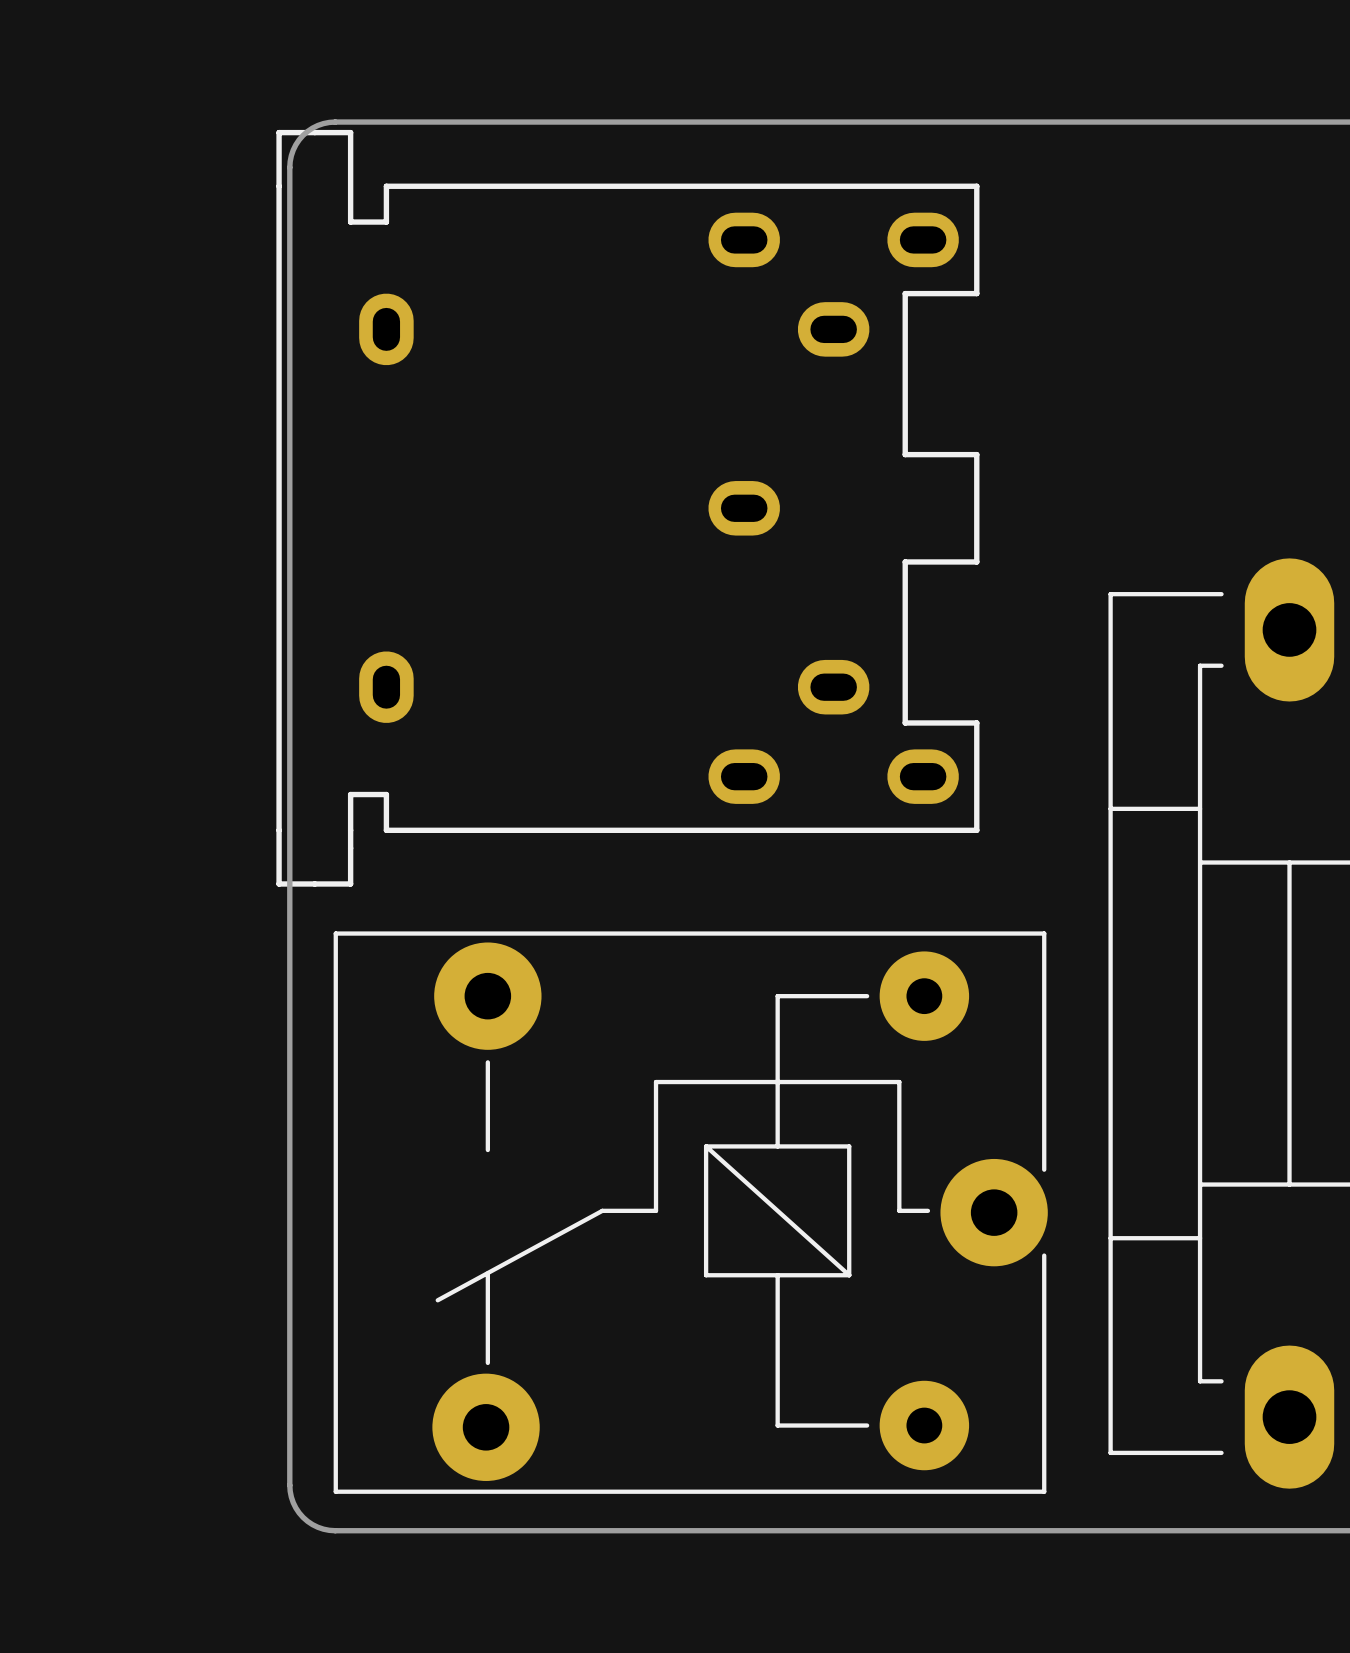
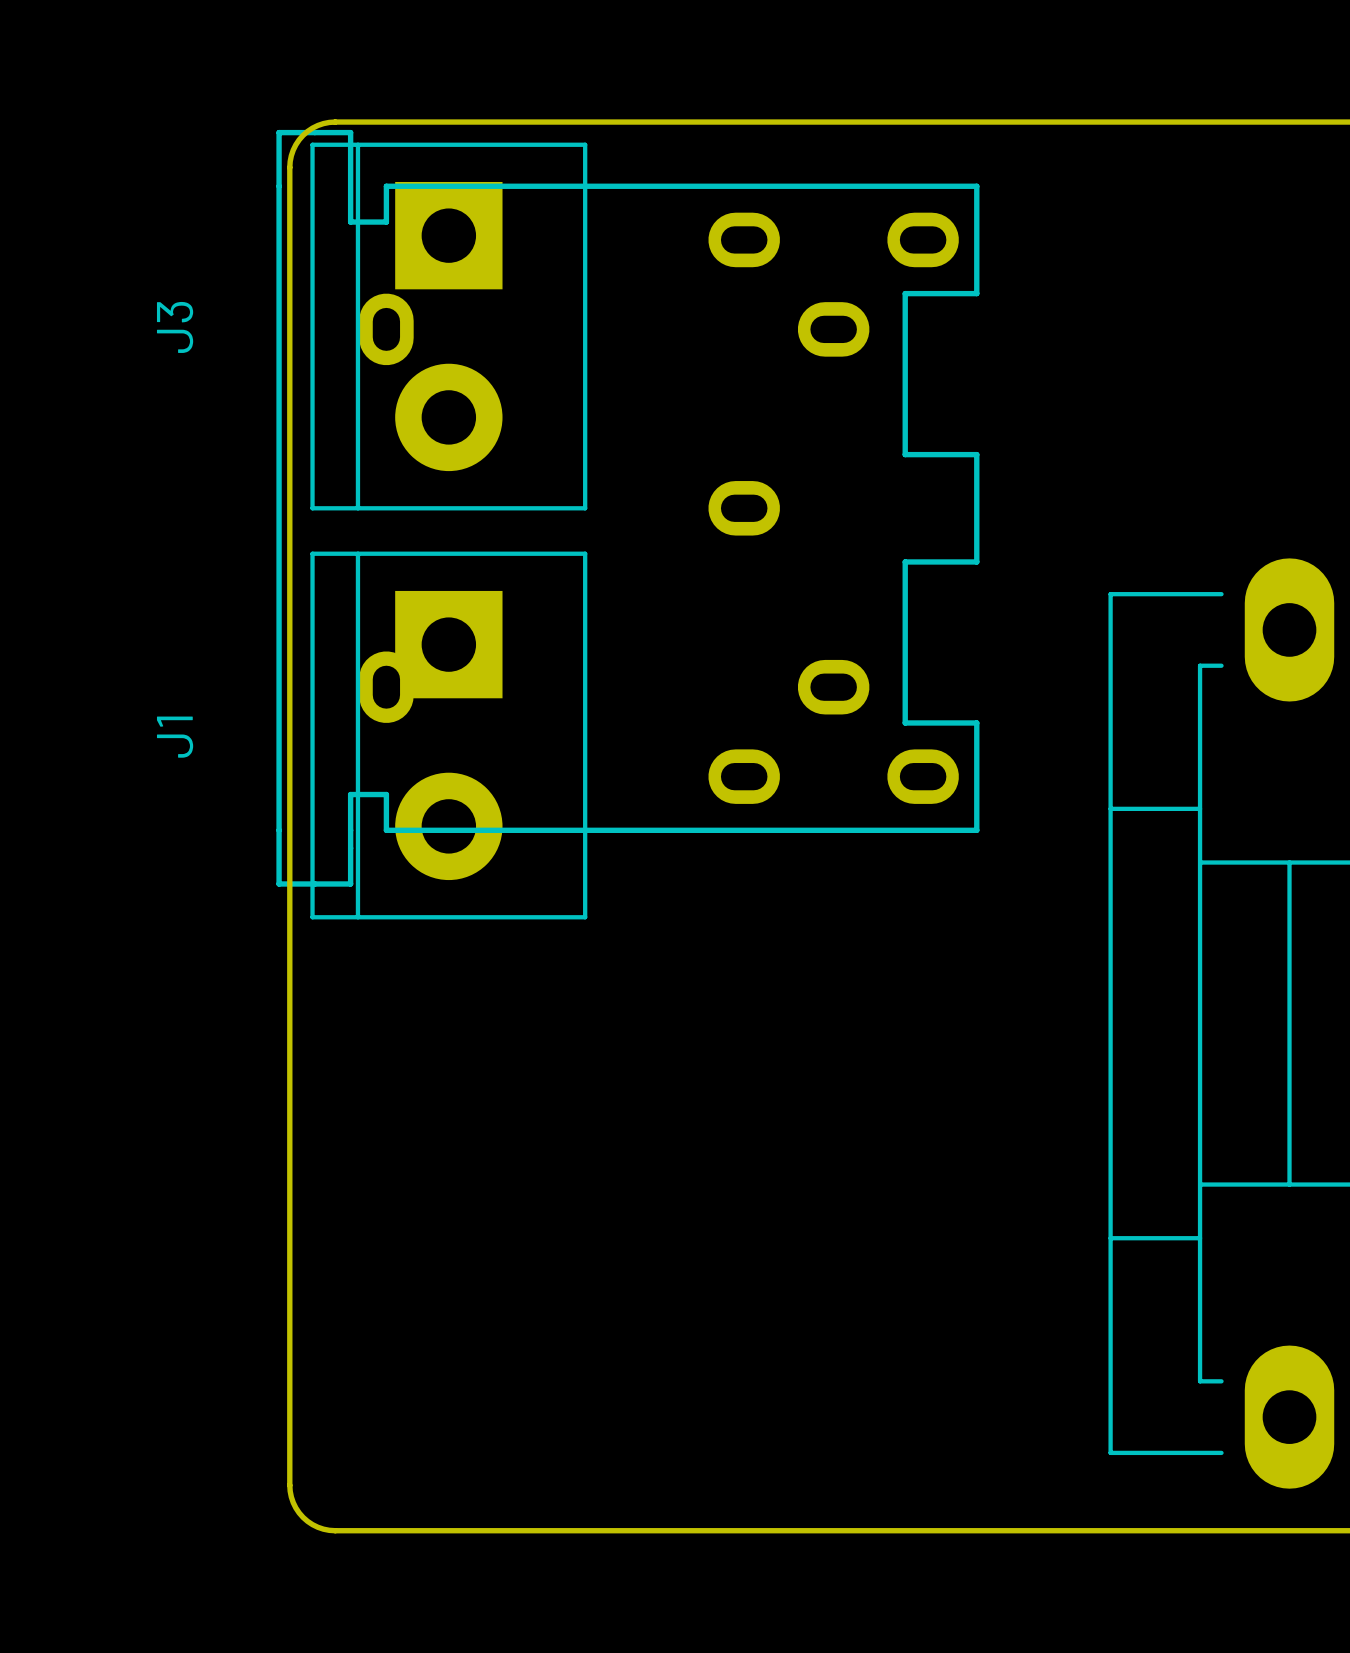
J3: none -> (448, 326)
J1: none -> (448, 735)
part: (690, 1212) -> none

